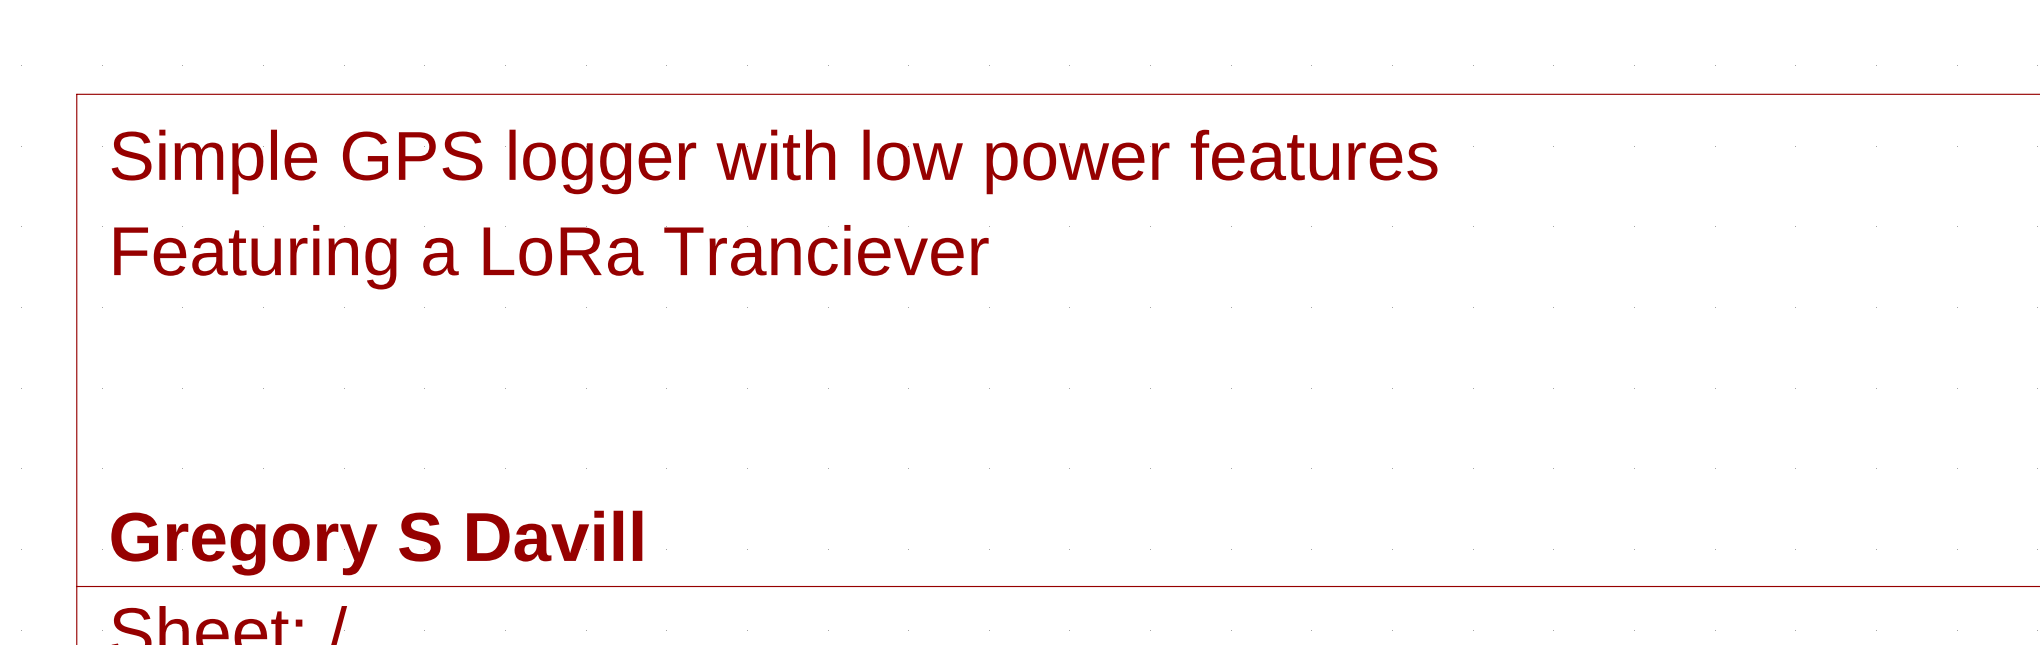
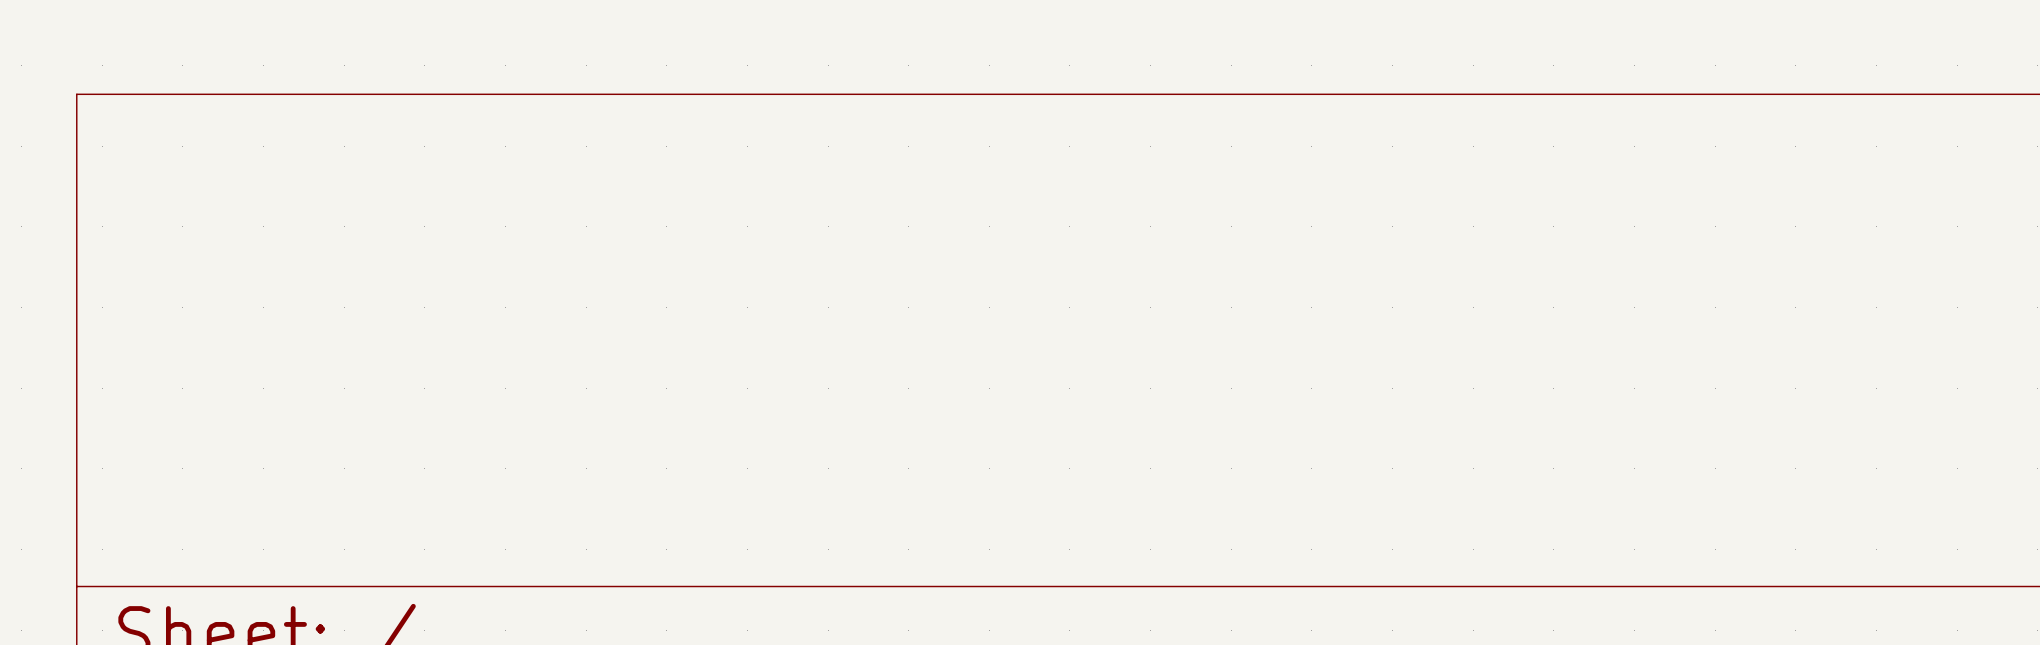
title block: Simple GPS logger with low power features (774, 161) -> none
title block: Featuring a LoRa Tranciever (551, 257) -> none
title block: Gregory S Davill (376, 543) -> none

